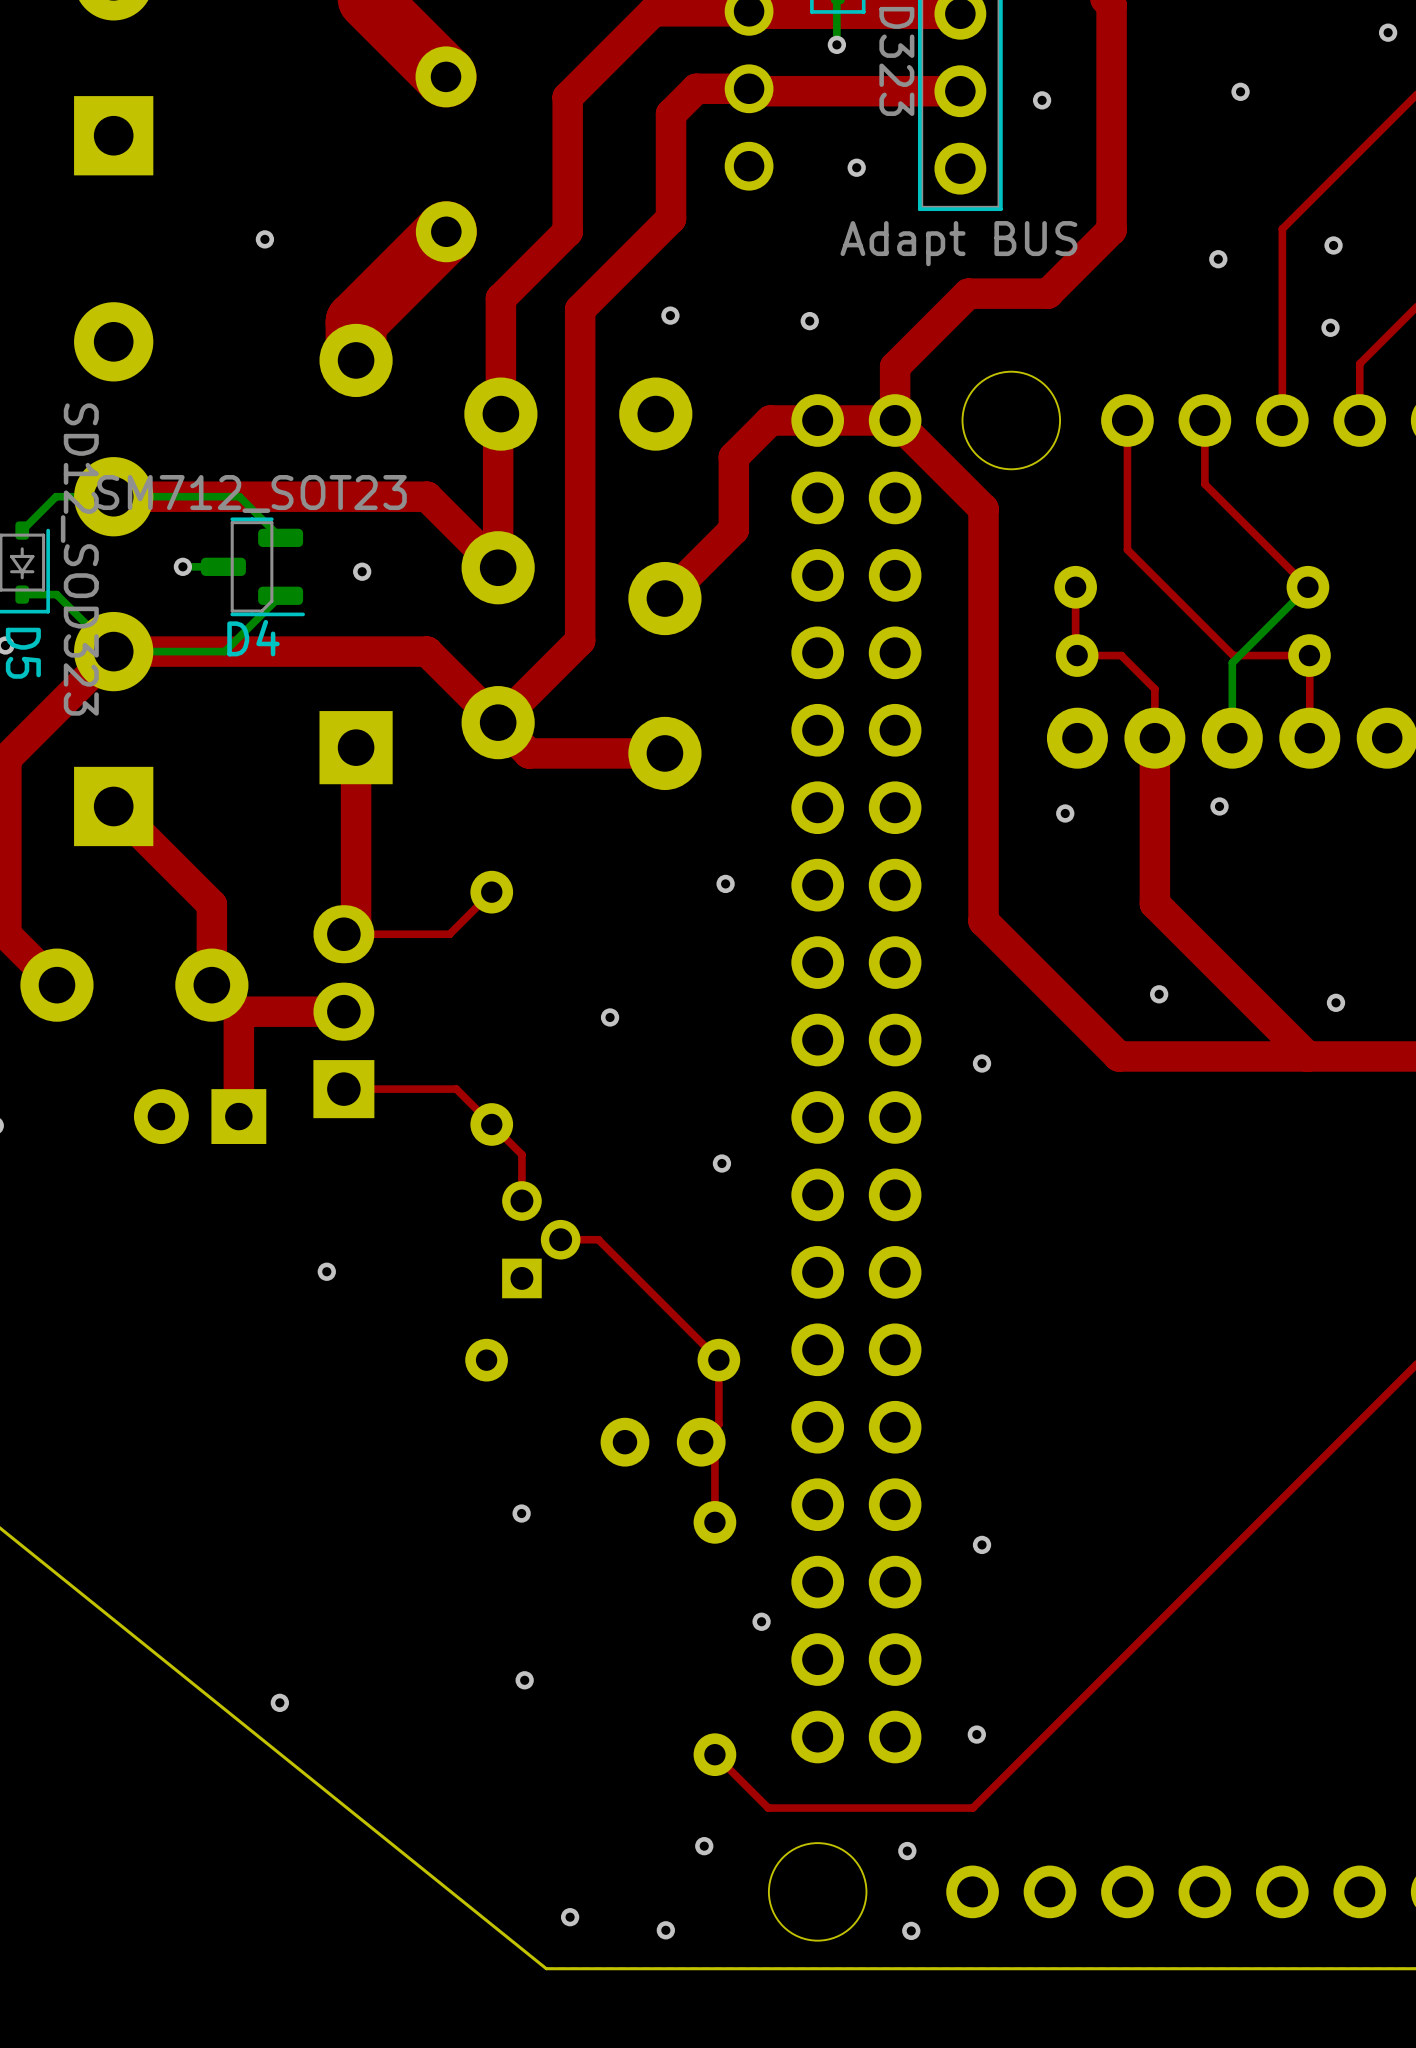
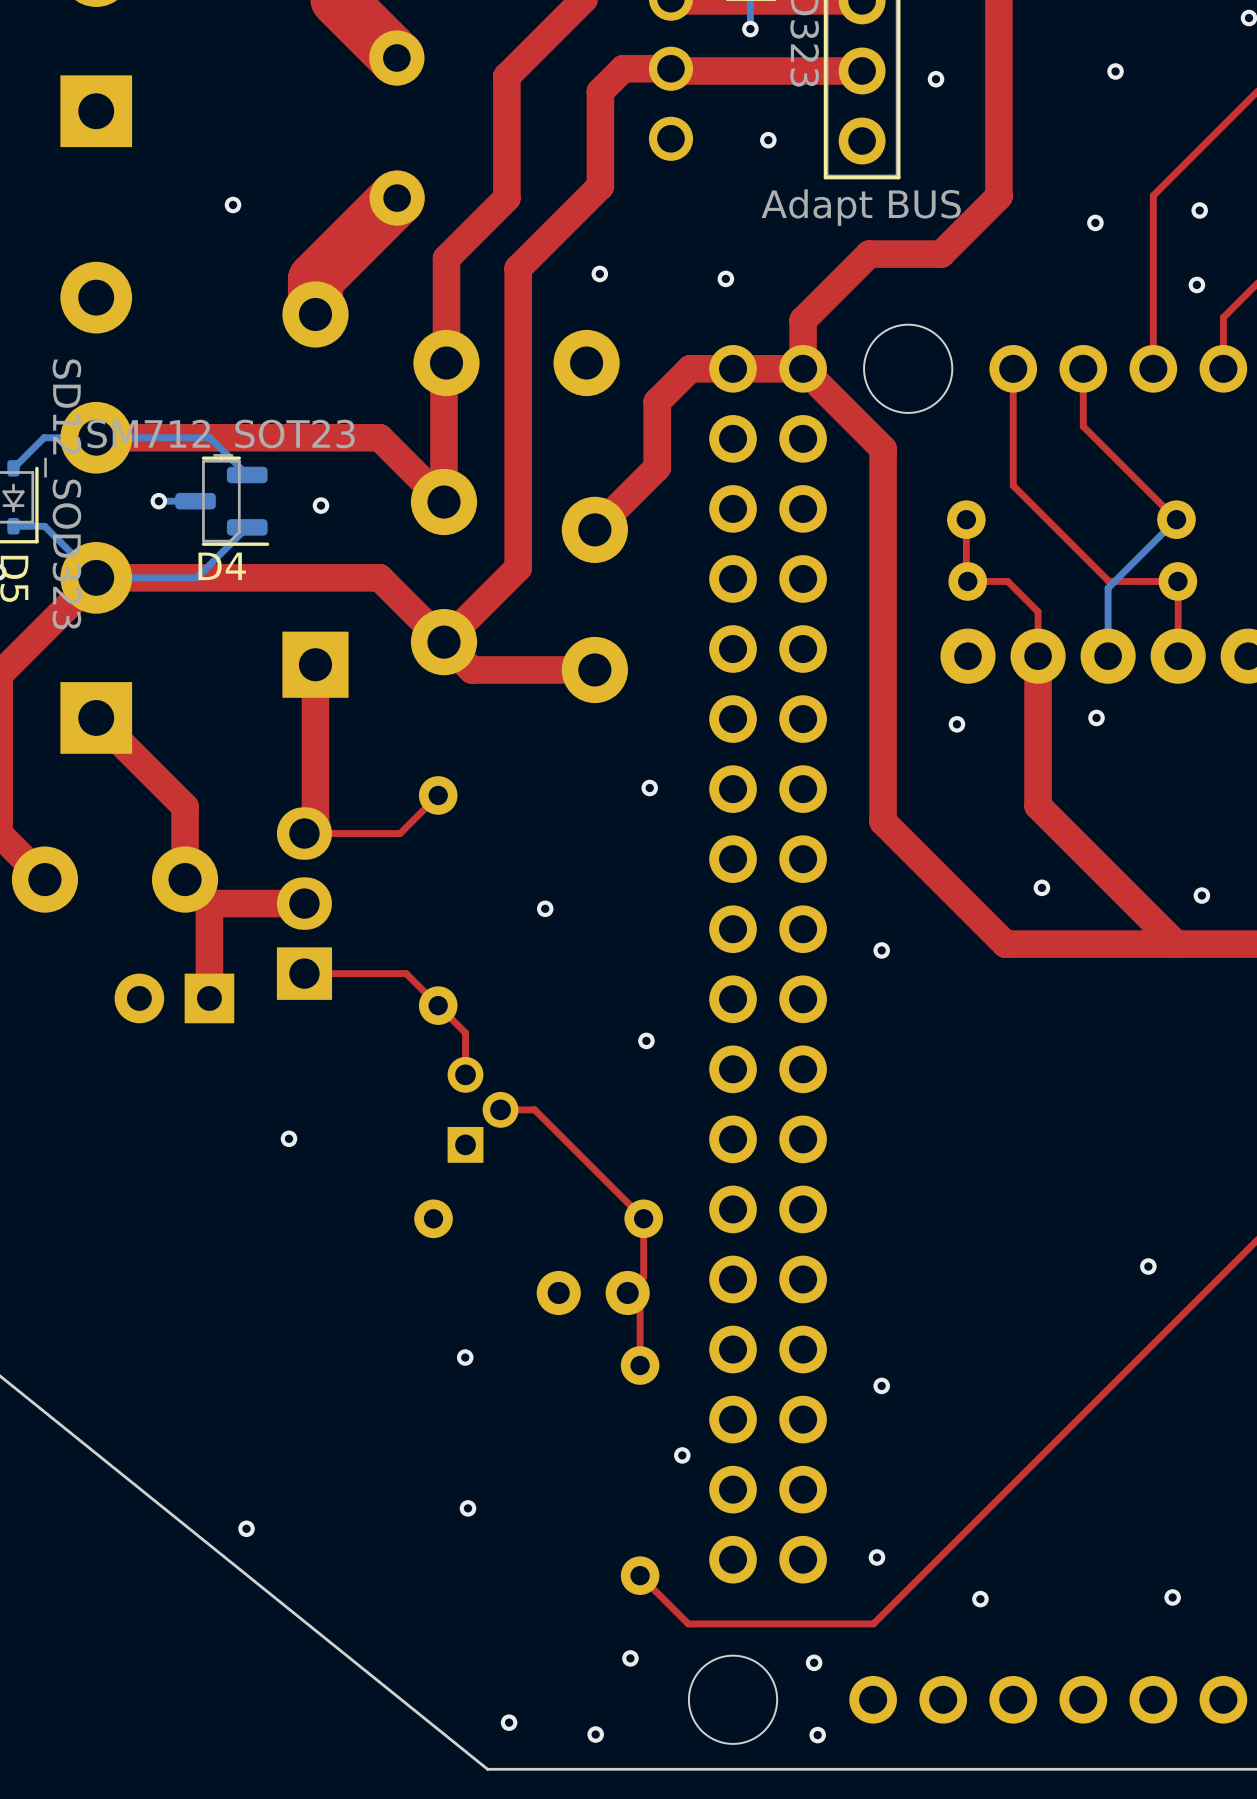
via: none -> (1148, 1266)
via: none -> (1172, 1597)
via: none -> (980, 1599)

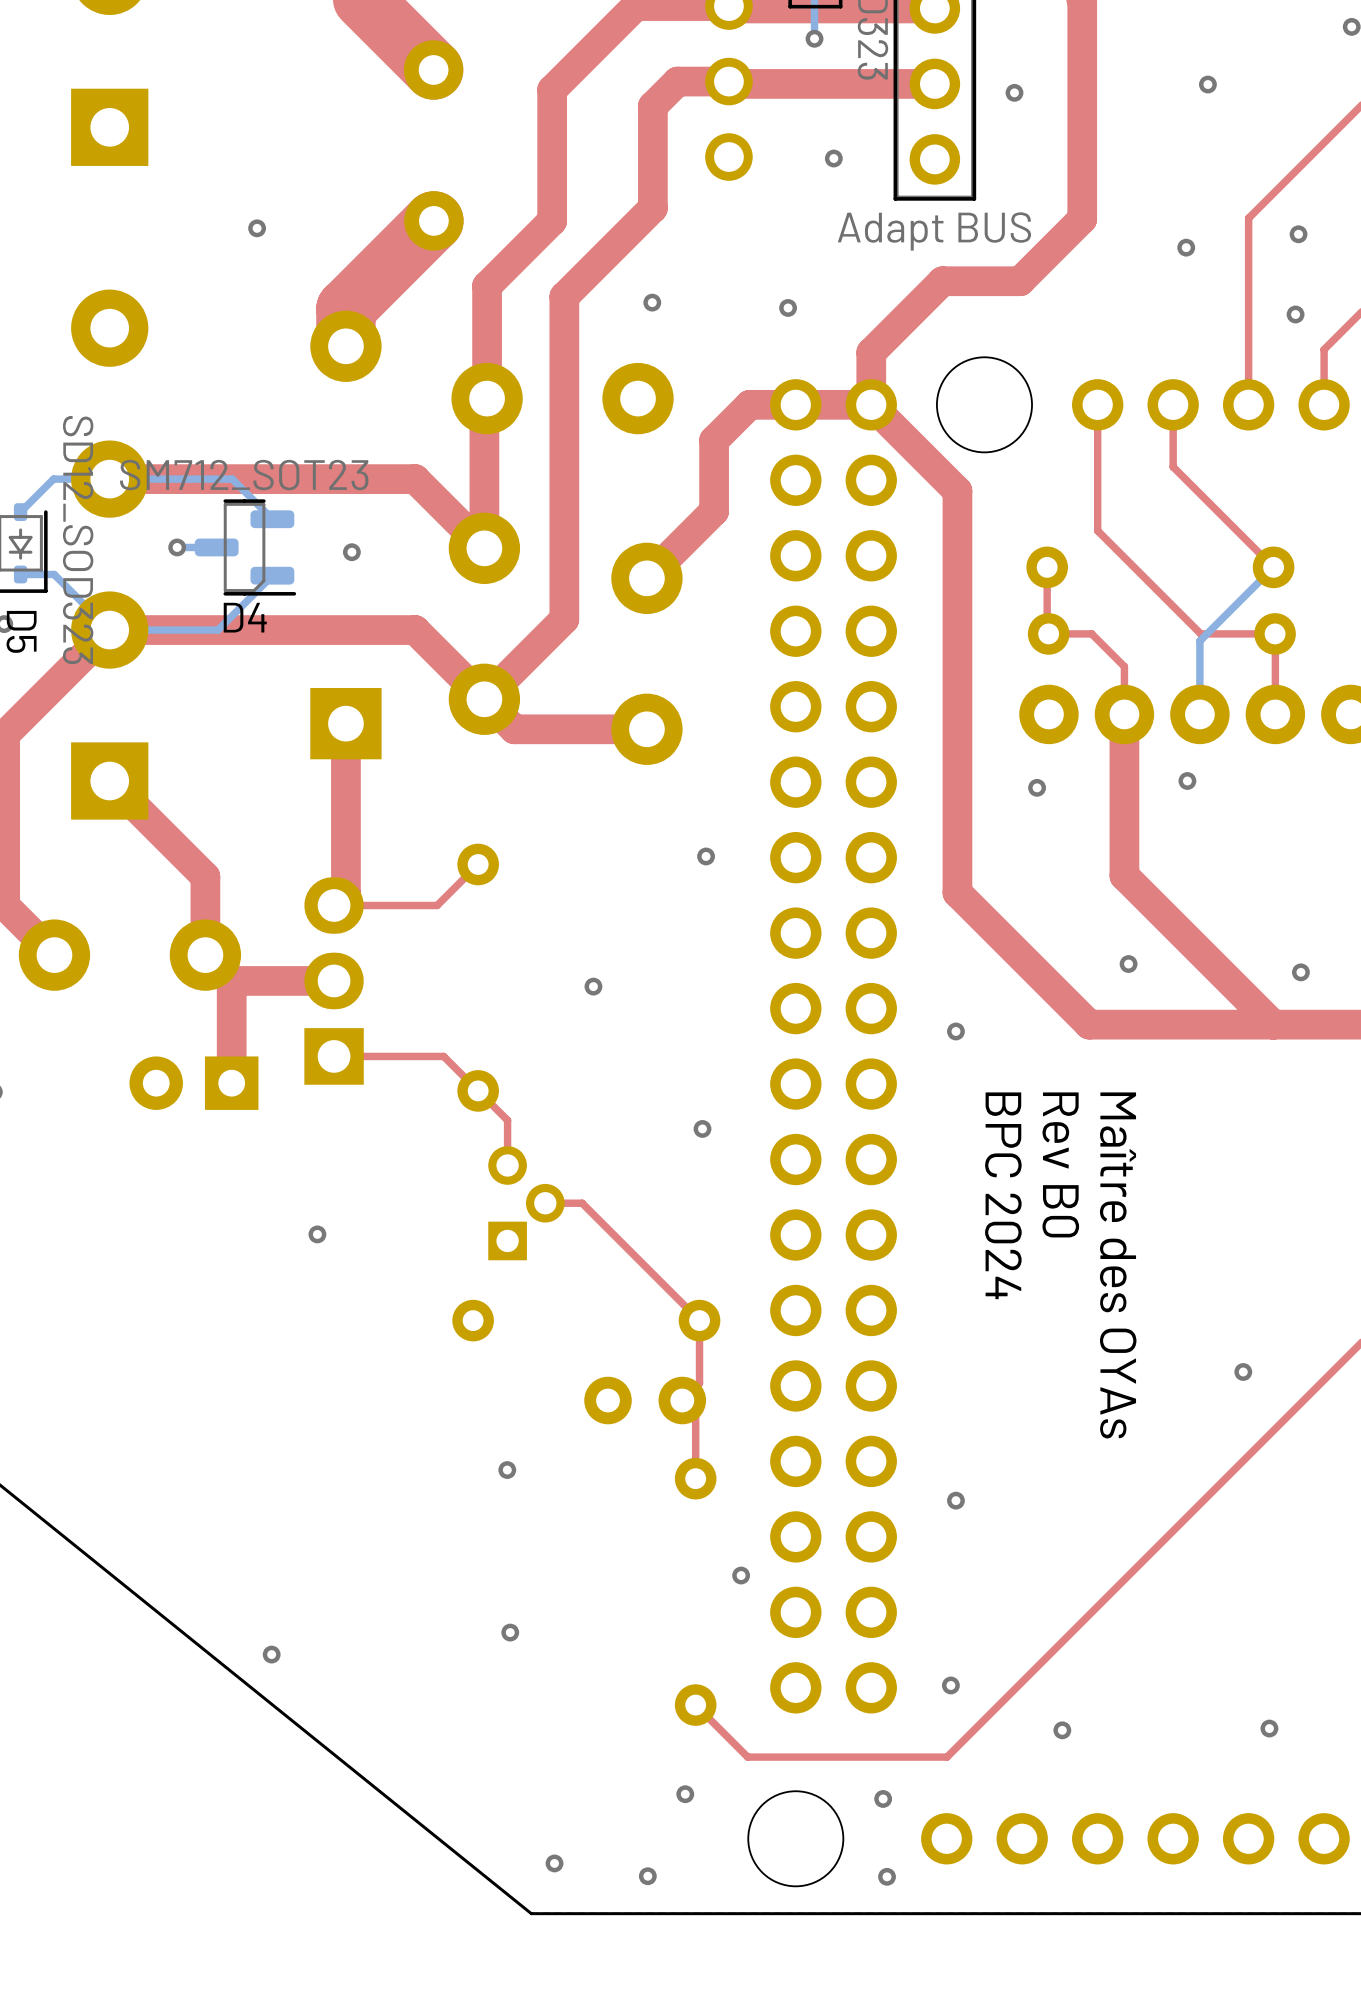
text: none -> Rev B0 (1060, 1164)
text: none -> BPC 2024 (1003, 1195)
text: none -> Maître des OYAs (1118, 1265)

